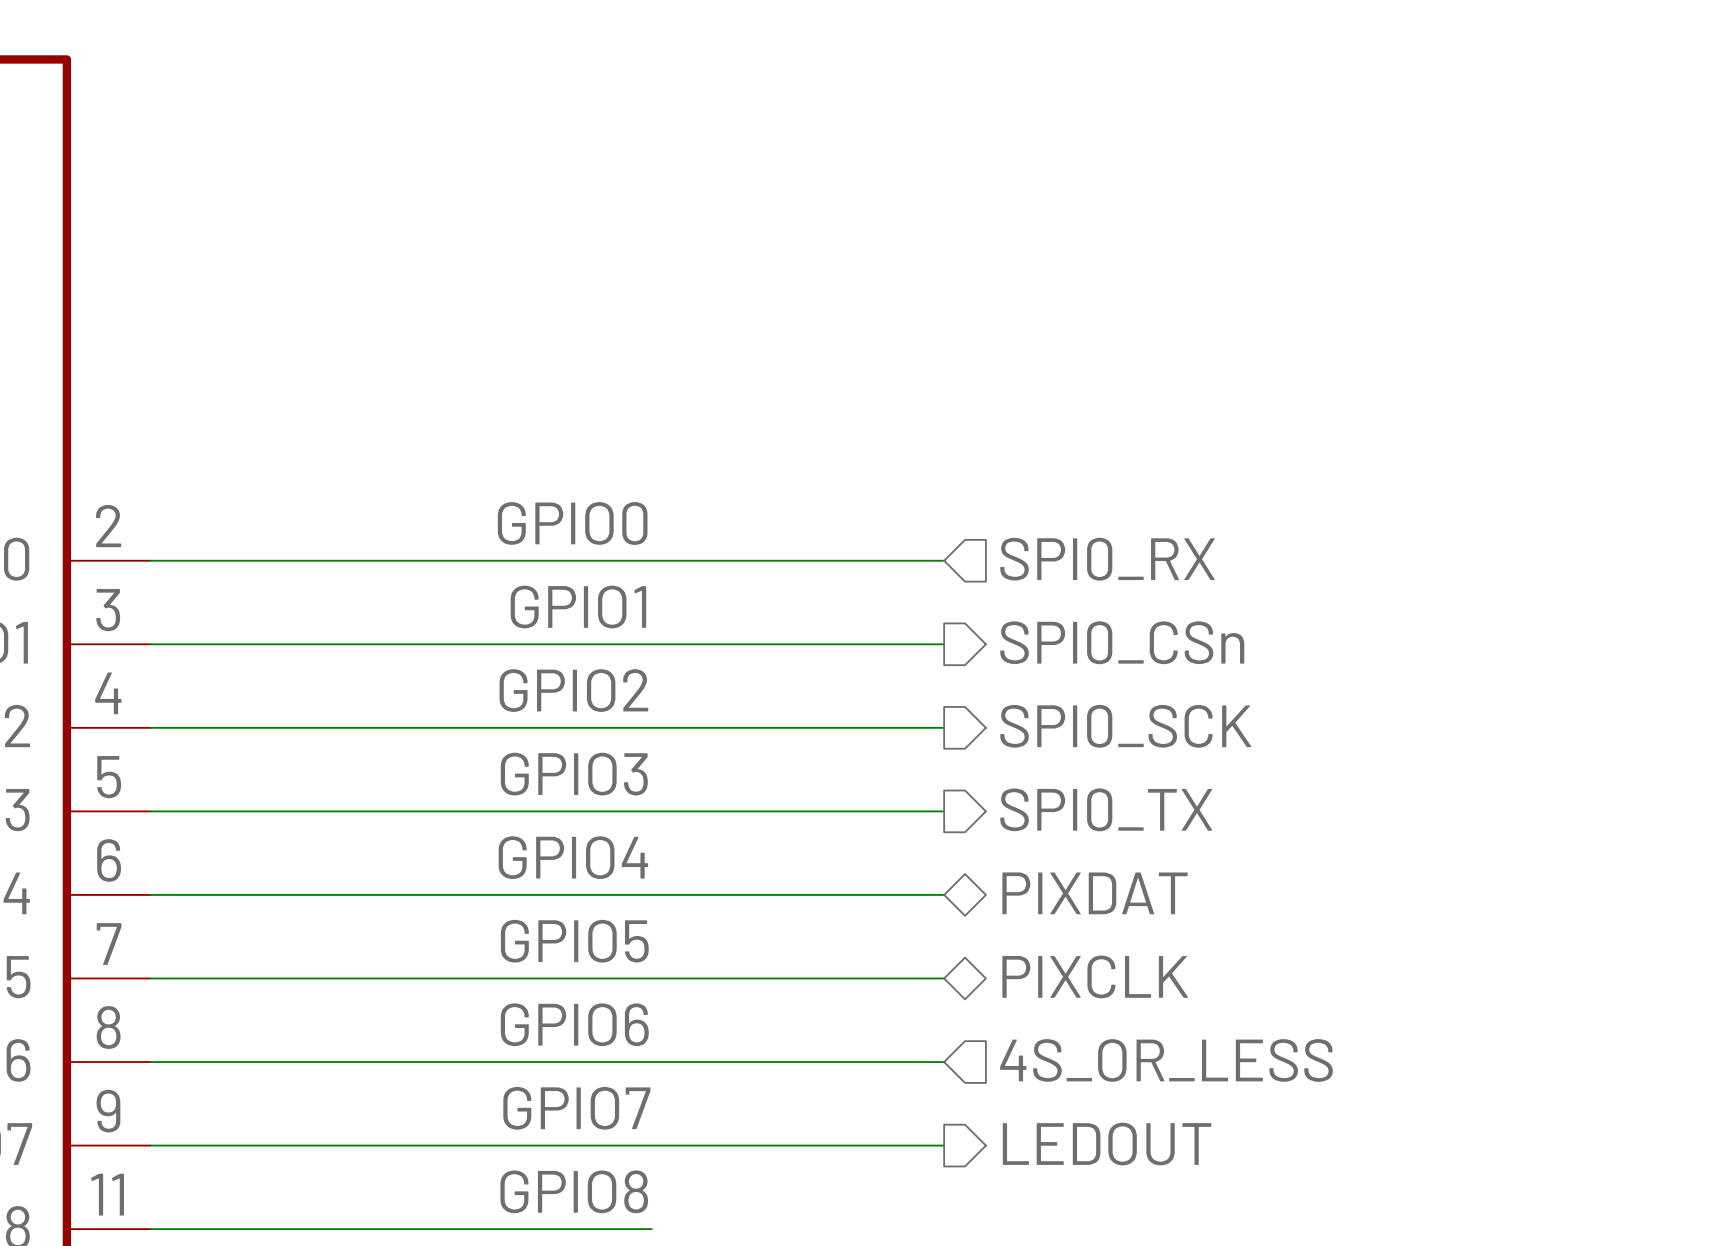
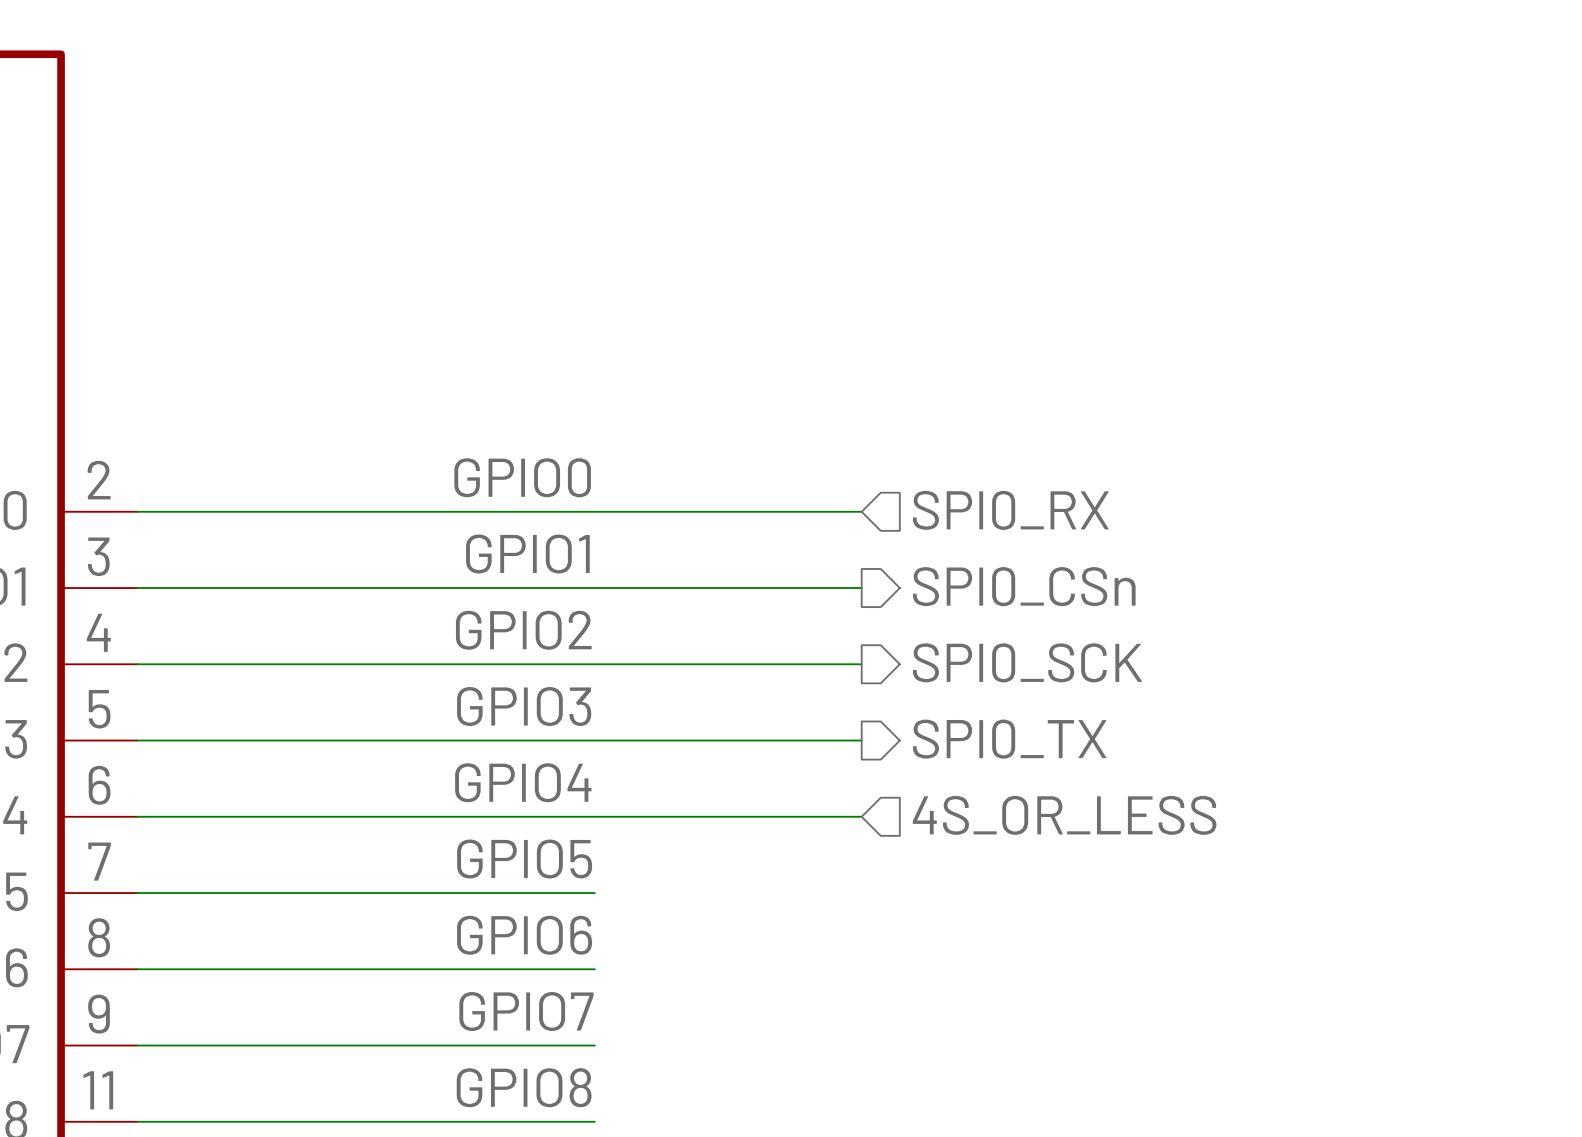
hierarchical label shape: bidirectional (1095, 893) -> input (1064, 815)
hierarchical label: PIXDAT (1095, 893) -> 4S_OR_LESS (1064, 815)
hierarchical label: PIXCLK (1095, 976) -> none
wire: (651, 978) (944, 978) -> none
hierarchical label: 4S_OR_LESS (1166, 1060) -> none
wire: (651, 1062) (944, 1062) -> none
hierarchical label: LEDOUT (1107, 1144) -> none
wire: (651, 1145) (944, 1145) -> none

